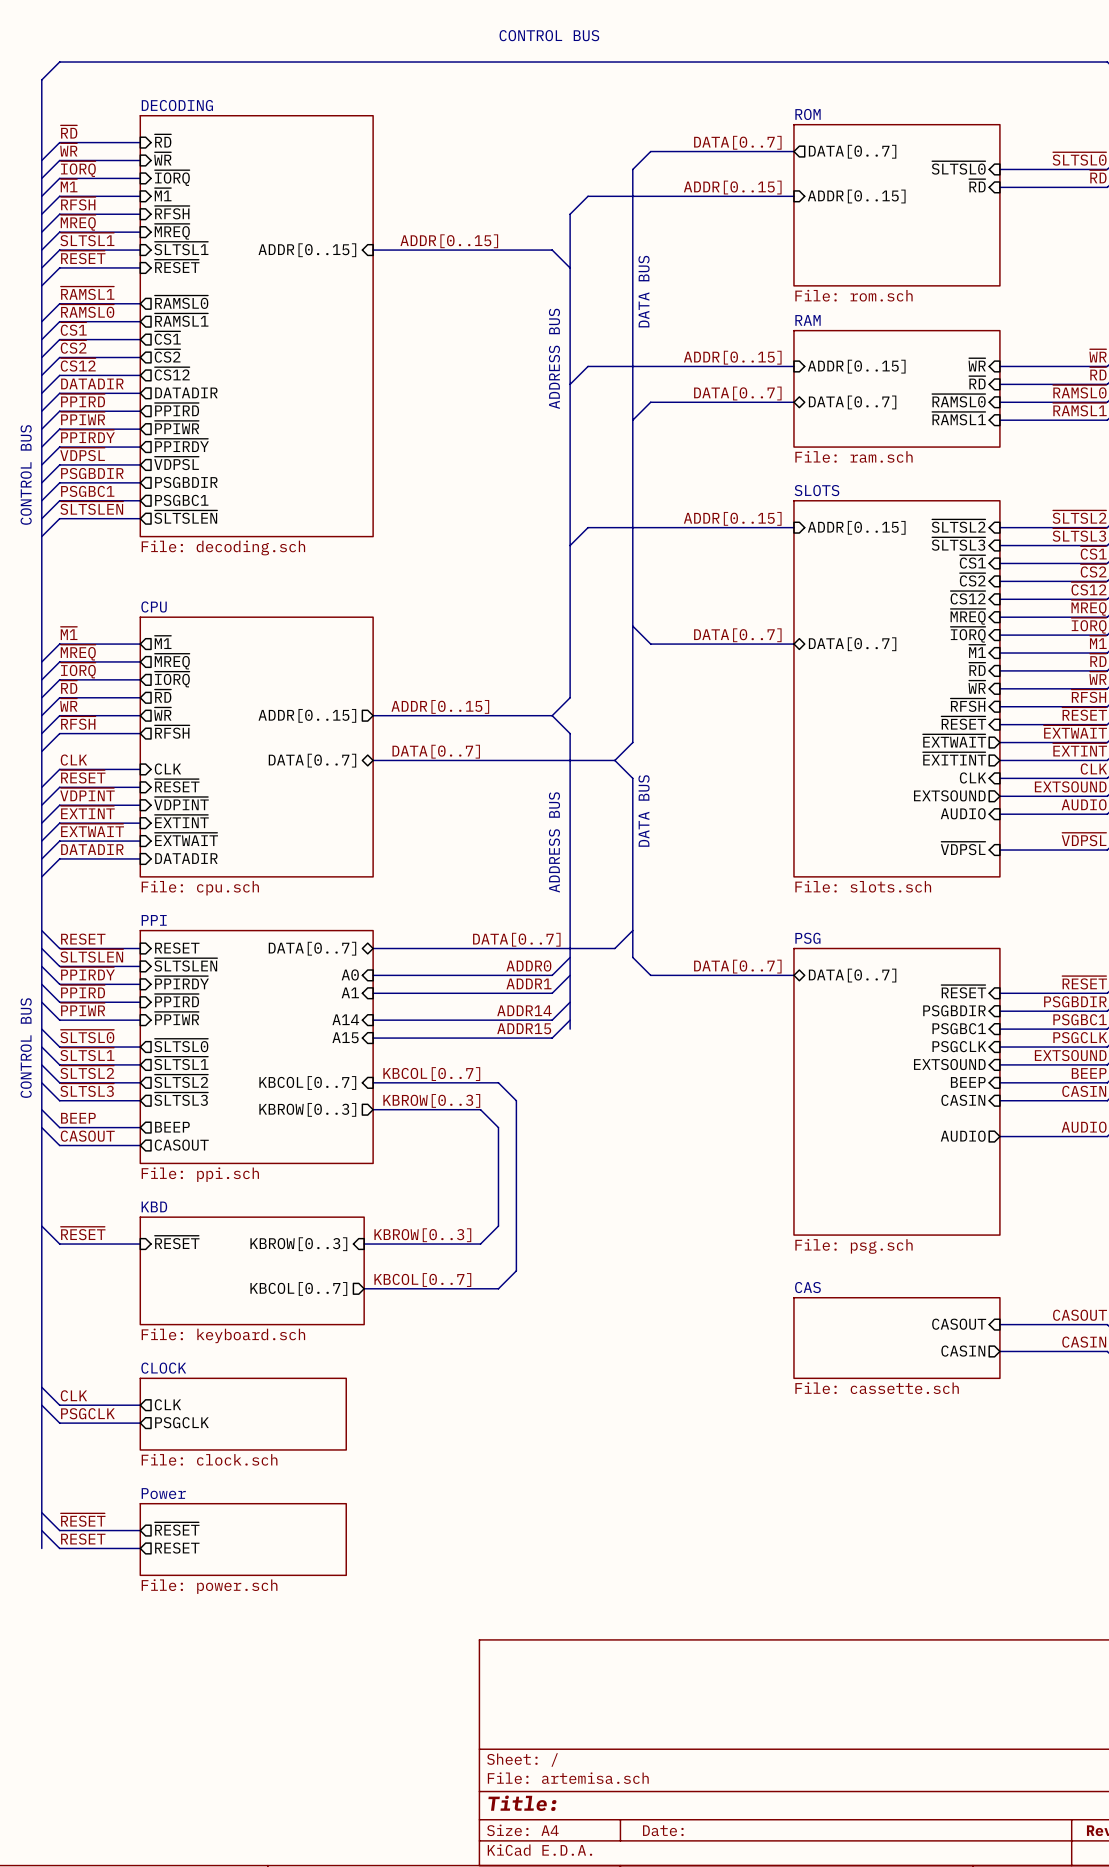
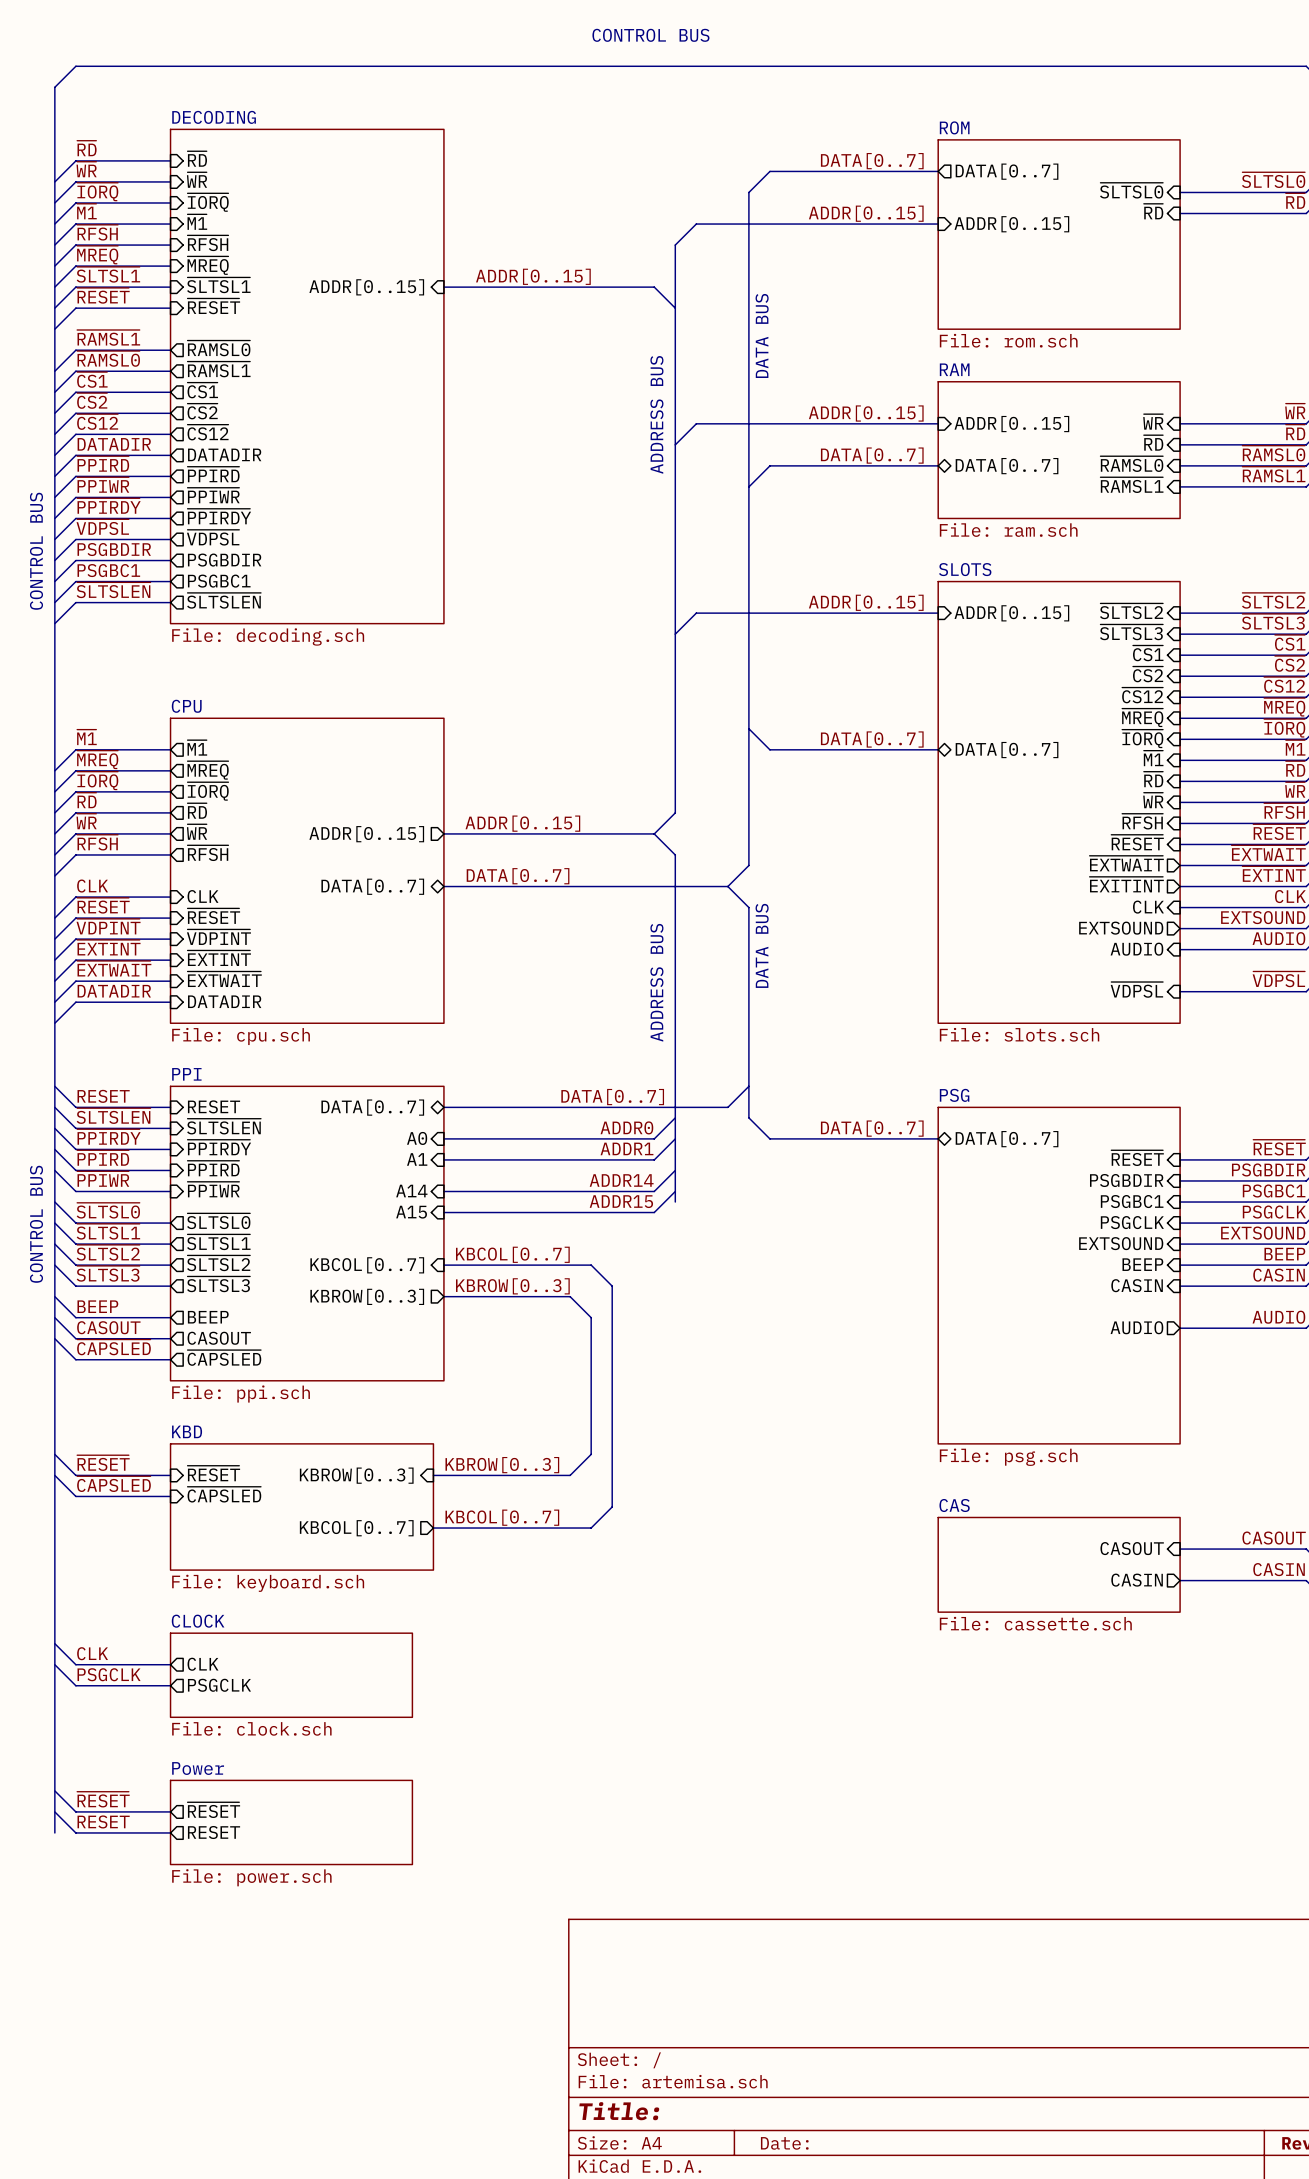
sheet PPI: File: ppi.sch (256, 1047) -> none
sheet PPI: none -> File: ppi.sch (307, 1233)
wire: none -> (54, 1338) (75, 1359) (170, 1359)
label: none -> ~{CAPSLED} (113, 1347)
sheet pin: none -> ~{CAPSLED} (224, 1357)
wire: (41, 1226) (59, 1244) (140, 1244) -> (54, 1475) (75, 1496) (170, 1496)
bus: (498, 1226) (480, 1244) (364, 1244) -> (591, 1433) (591, 1454) (570, 1475) (433, 1475)
label position: ~{RESET} (83, 1233) -> ~{RESET} (103, 1463)
label position: KBROW[0..3] (422, 1235) -> KBROW[0..3] (502, 1465)
sheet pin position: ~{RESET} (177, 1242) -> ~{RESET} (213, 1473)
wire: none -> (54, 1454) (75, 1475) (170, 1475)
sheet pin position: KBROW[0..3] (298, 1244) -> KBROW[0..3] (356, 1475)
label: none -> ~{CAPSLED} (113, 1484)
sheet KBD position: (252, 1270) -> (301, 1506)
bus: (516, 1270) (498, 1288) (364, 1288) -> (612, 1485) (612, 1506) (591, 1528) (433, 1528)
sheet pin: none -> ~{CAPSLED} (224, 1494)
label position: KBCOL[0..7] (422, 1280) -> KBCOL[0..7] (502, 1517)
sheet pin position: KBCOL[0..7] (298, 1288) -> KBCOL[0..7] (356, 1528)
wire: (41, 1387) (59, 1405) (140, 1405) -> (54, 1664) (75, 1685) (170, 1685)
label: CLK (73, 1395) -> none
sheet pin: CLK (167, 1404) -> none
label: PSGCLK (87, 1413) -> CLK (92, 1653)
sheet CLOCK position: (243, 1414) -> (291, 1675)
sheet pin: PSGCLK (181, 1422) -> CLK (203, 1664)
label: none -> PSGCLK (109, 1674)
sheet pin: none -> PSGCLK (219, 1685)
wire: (41, 1512) (59, 1530) (140, 1530) -> (54, 1811) (75, 1832) (170, 1832)
label: ~{RESET} (83, 1520) -> none
sheet pin: ~{RESET} (177, 1529) -> none
label: RESET (83, 1539) -> ~{RESET} (103, 1799)
sheet Power position: (243, 1539) -> (291, 1822)
bus: none -> (54, 1811) (54, 1832)
sheet pin: RESET (177, 1548) -> ~{RESET} (213, 1810)
label: none -> RESET (103, 1821)
sheet pin: none -> RESET (214, 1832)

